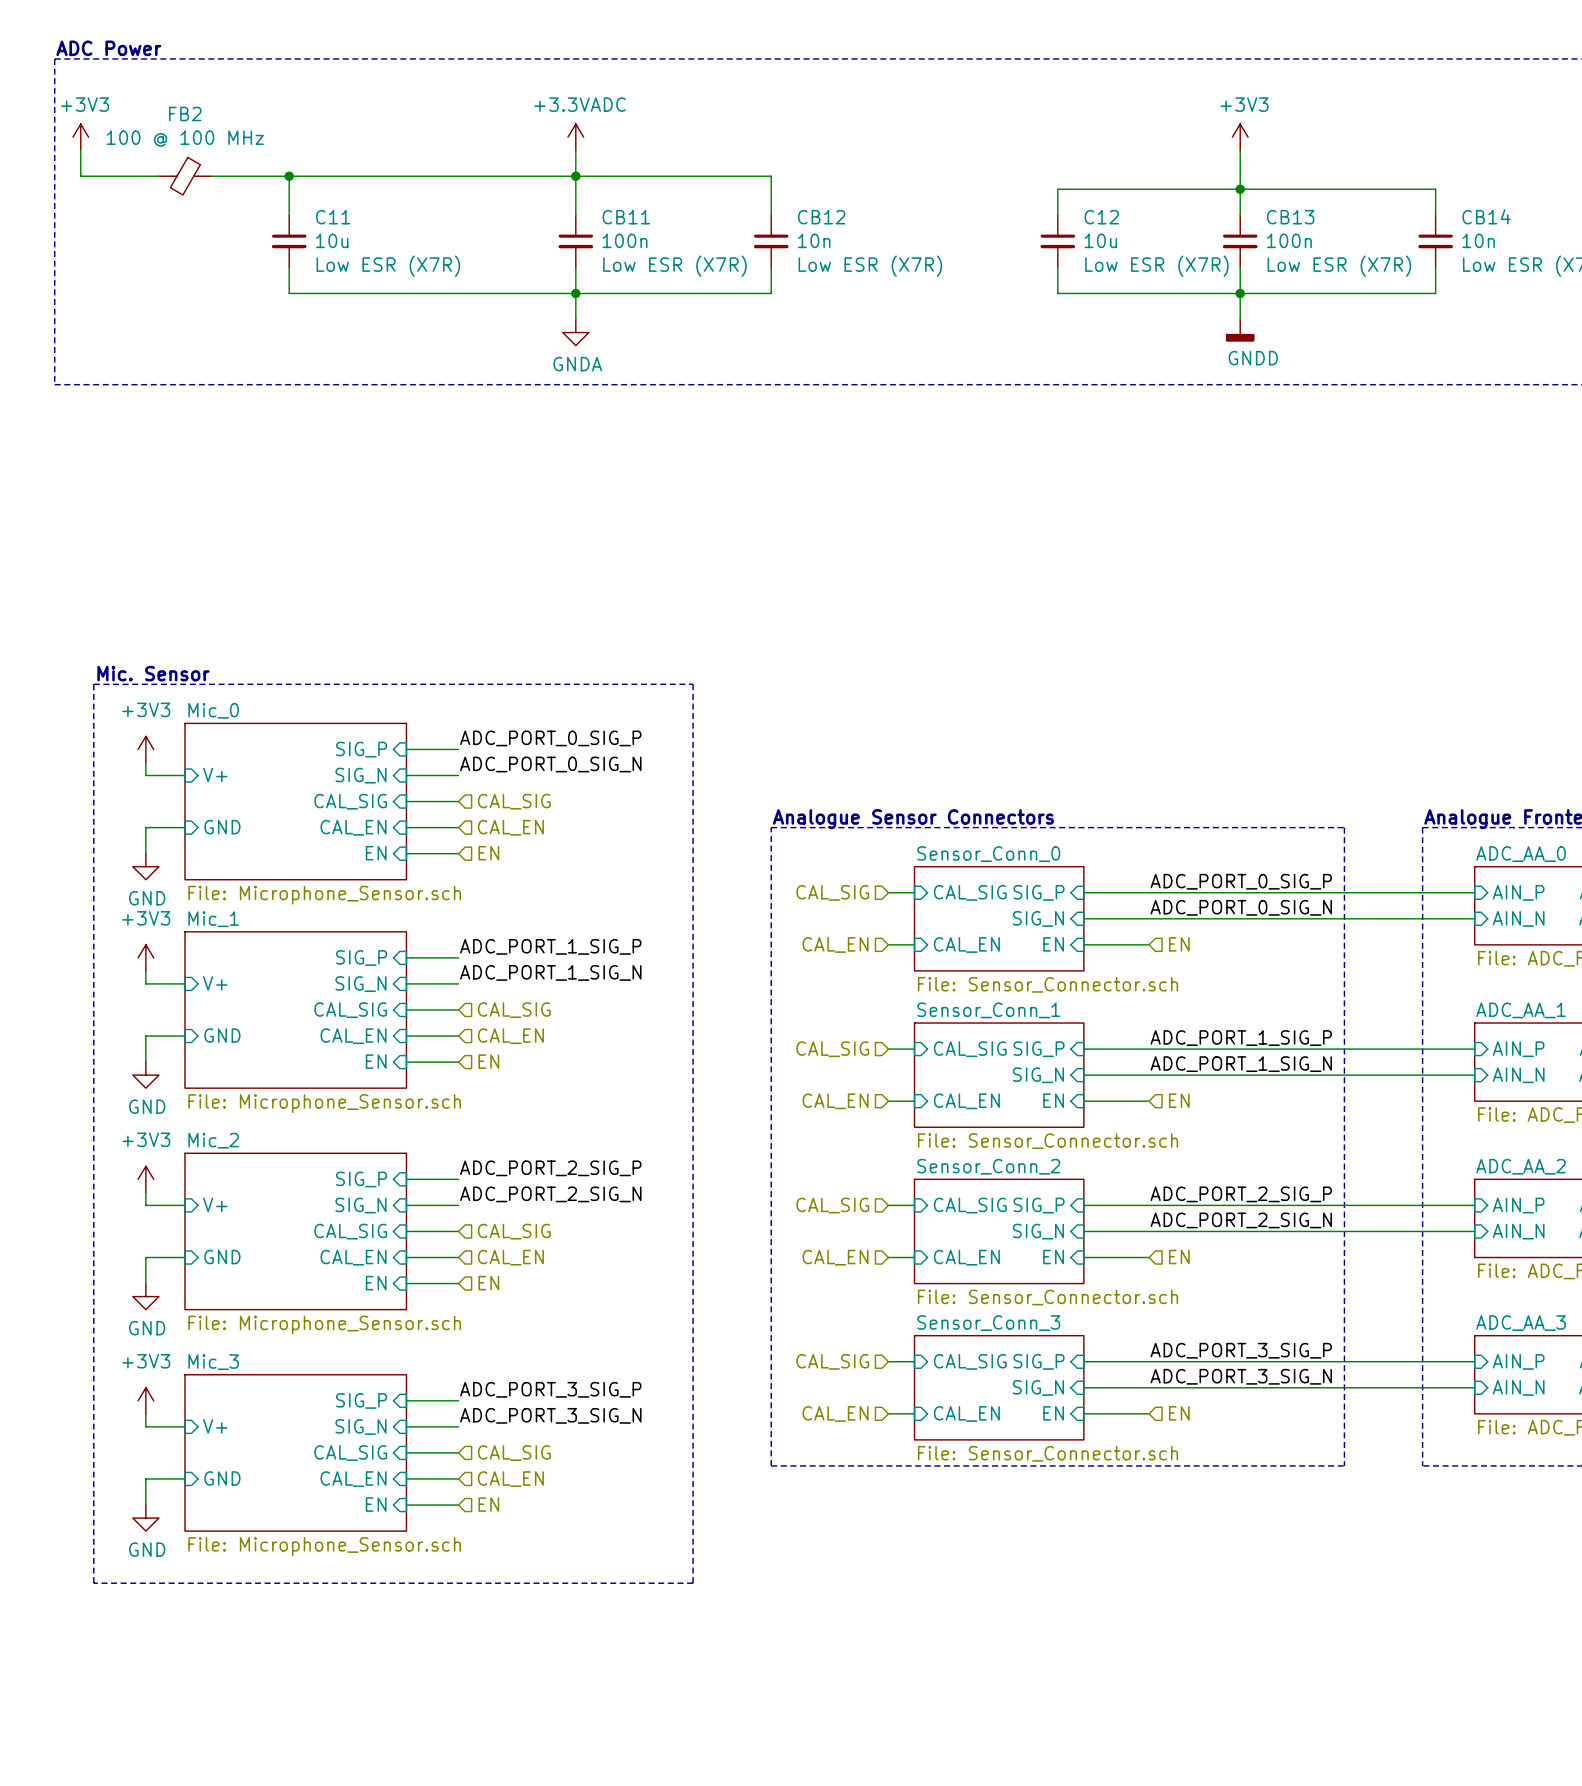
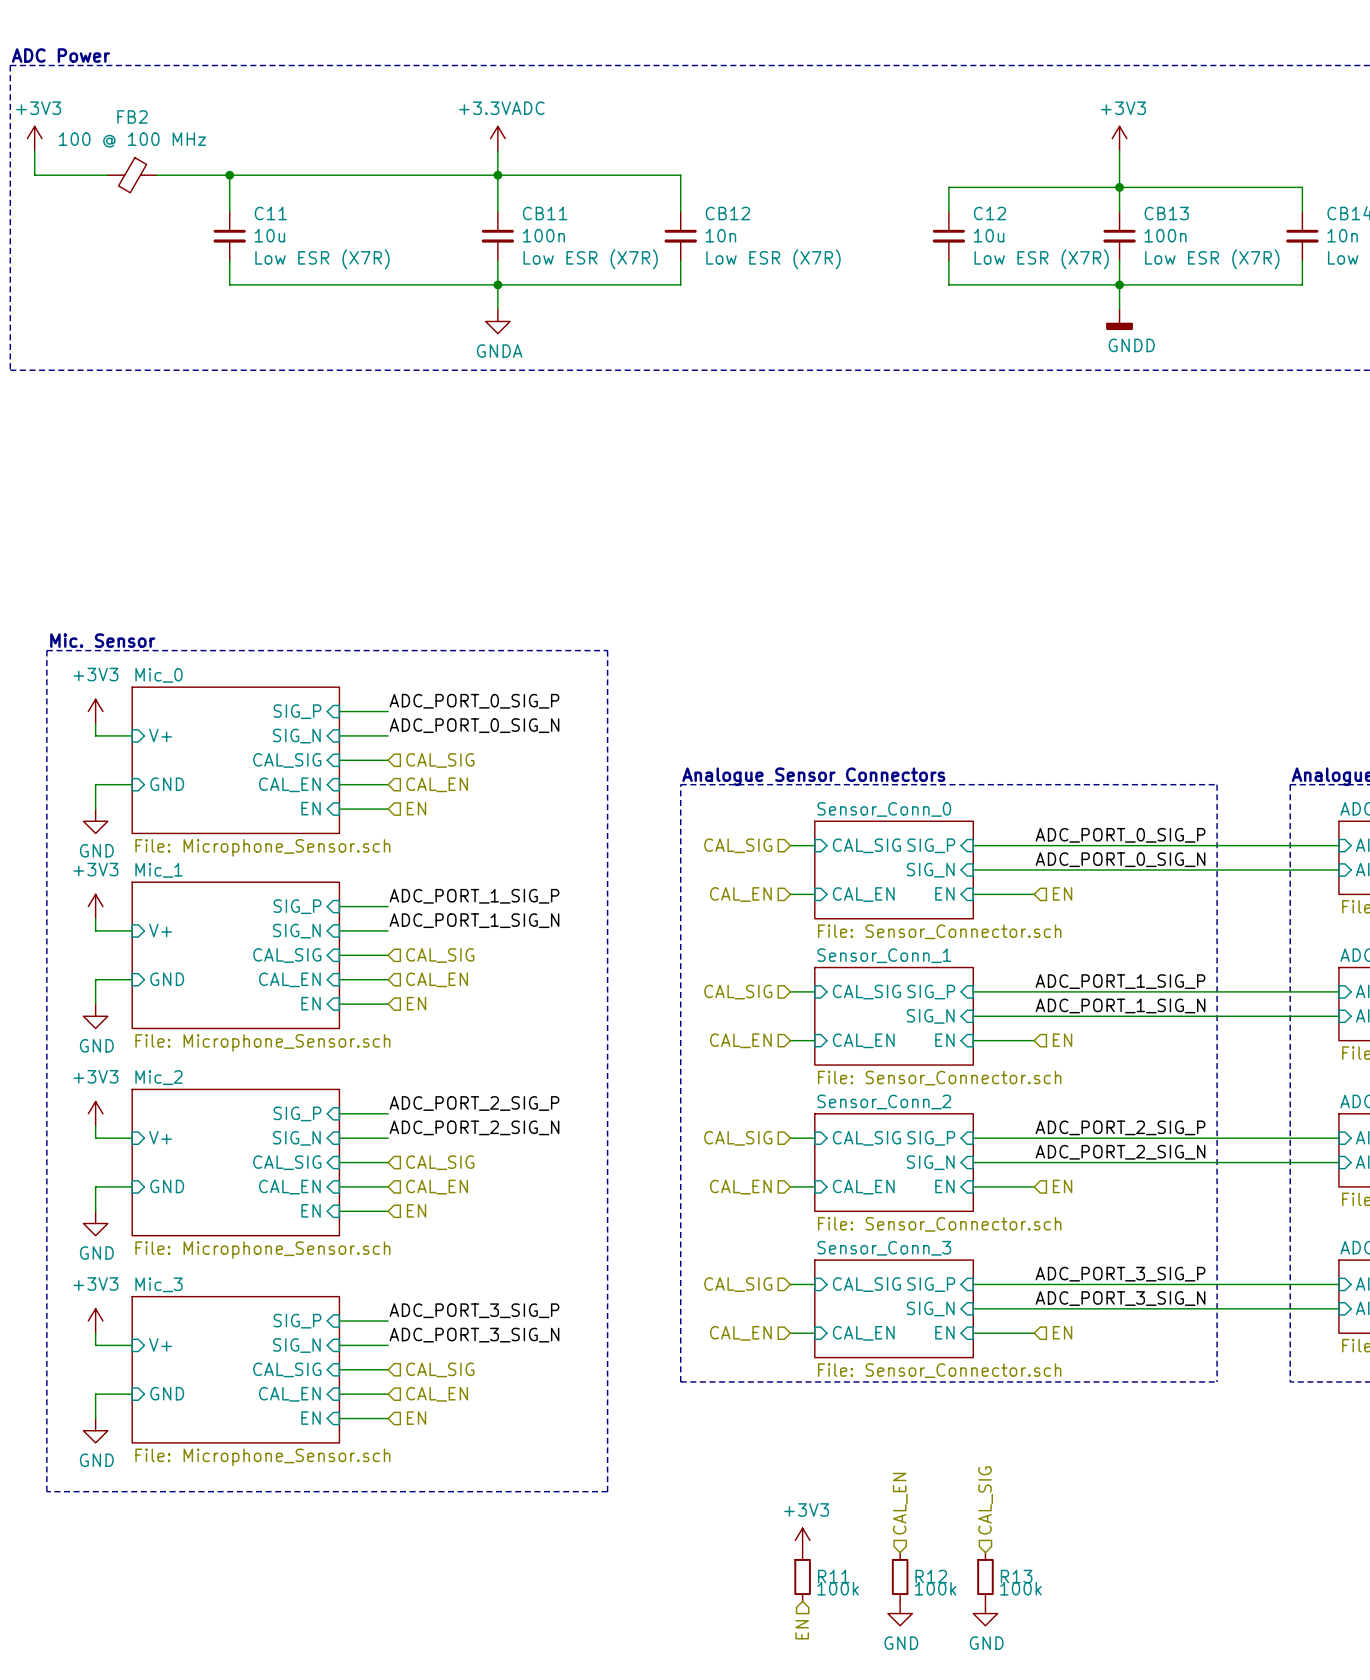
hierarchical label: none -> CAL_SIG (985, 1500)
hierarchical label: none -> CAL_EN (900, 1503)
power symbol: none -> +3V3 (802, 1540)
R11: none -> 100k (802, 1577)
R12: none -> 100k (900, 1577)
R13: none -> 100k (985, 1577)
power symbol: none -> GND (900, 1613)
power symbol: none -> GND (985, 1613)
hierarchical label: none -> EN (802, 1629)

